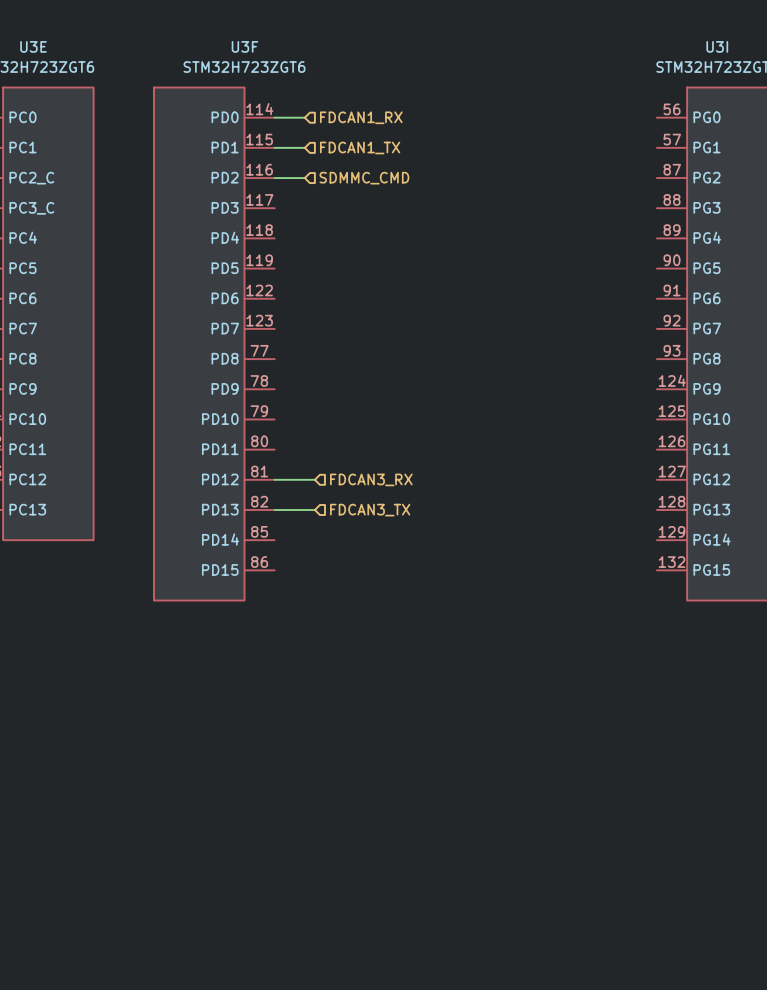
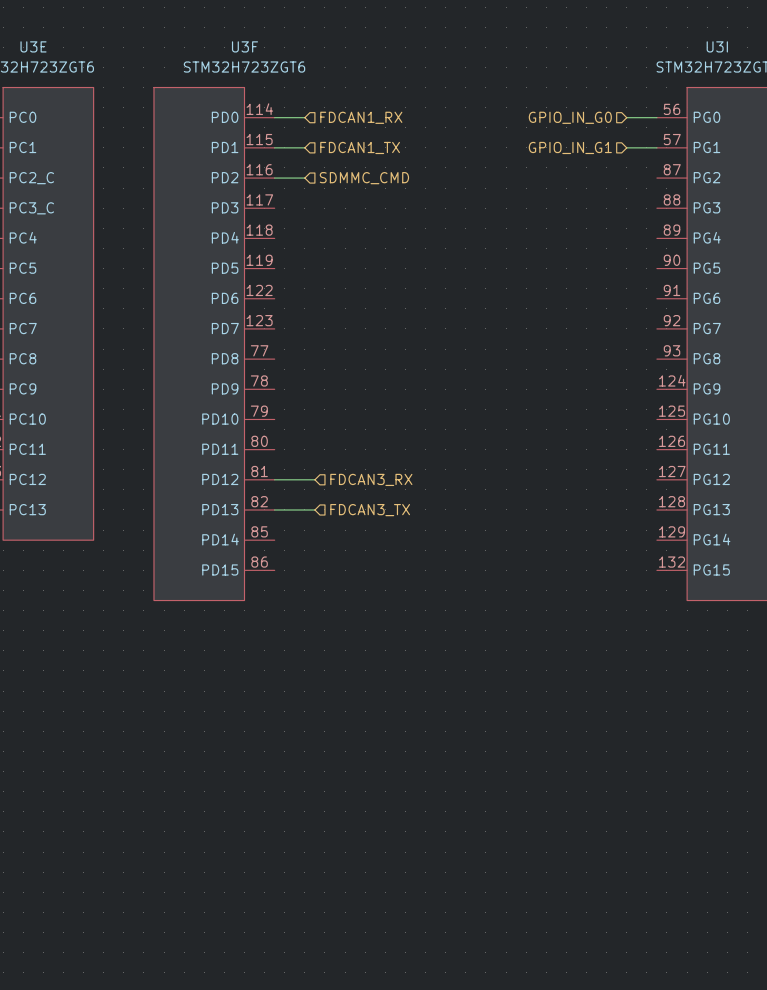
hierarchical label: none -> GPIO_IN_G0 (570, 117)
wire: none -> (626, 117) (656, 117)
hierarchical label: none -> GPIO_IN_G1 (570, 147)
wire: none -> (626, 147) (656, 147)

